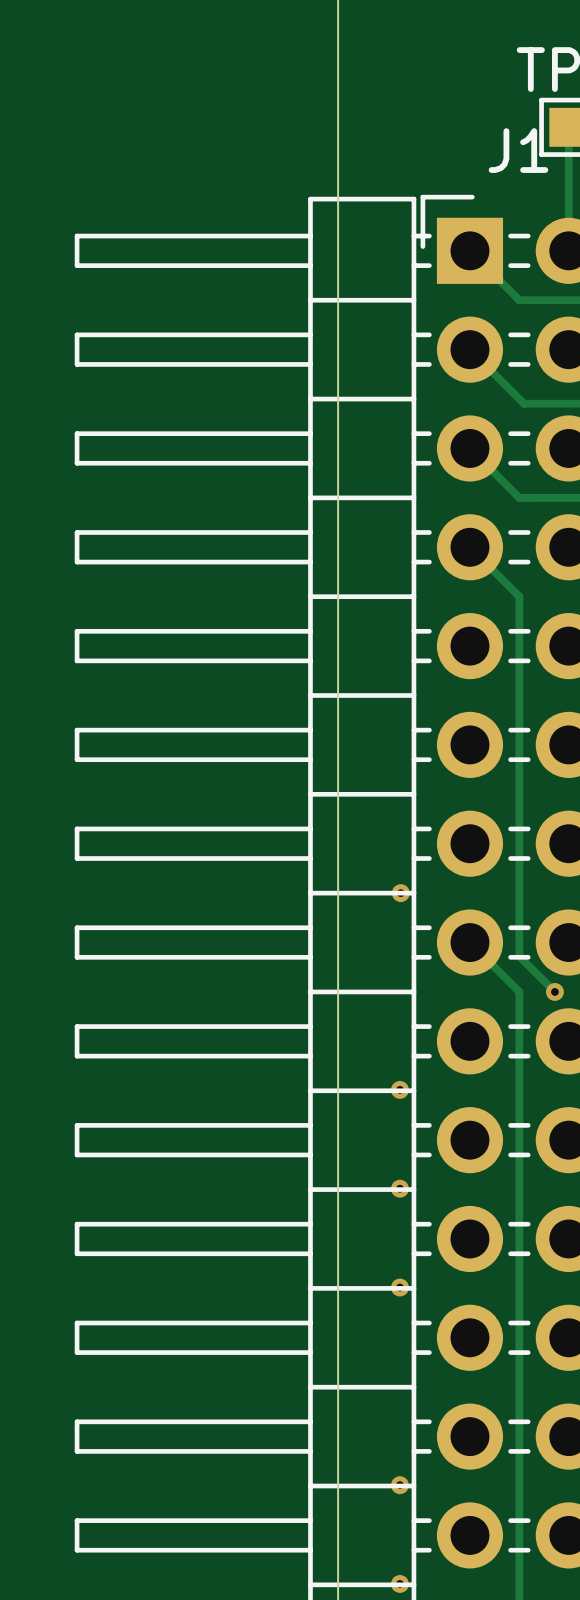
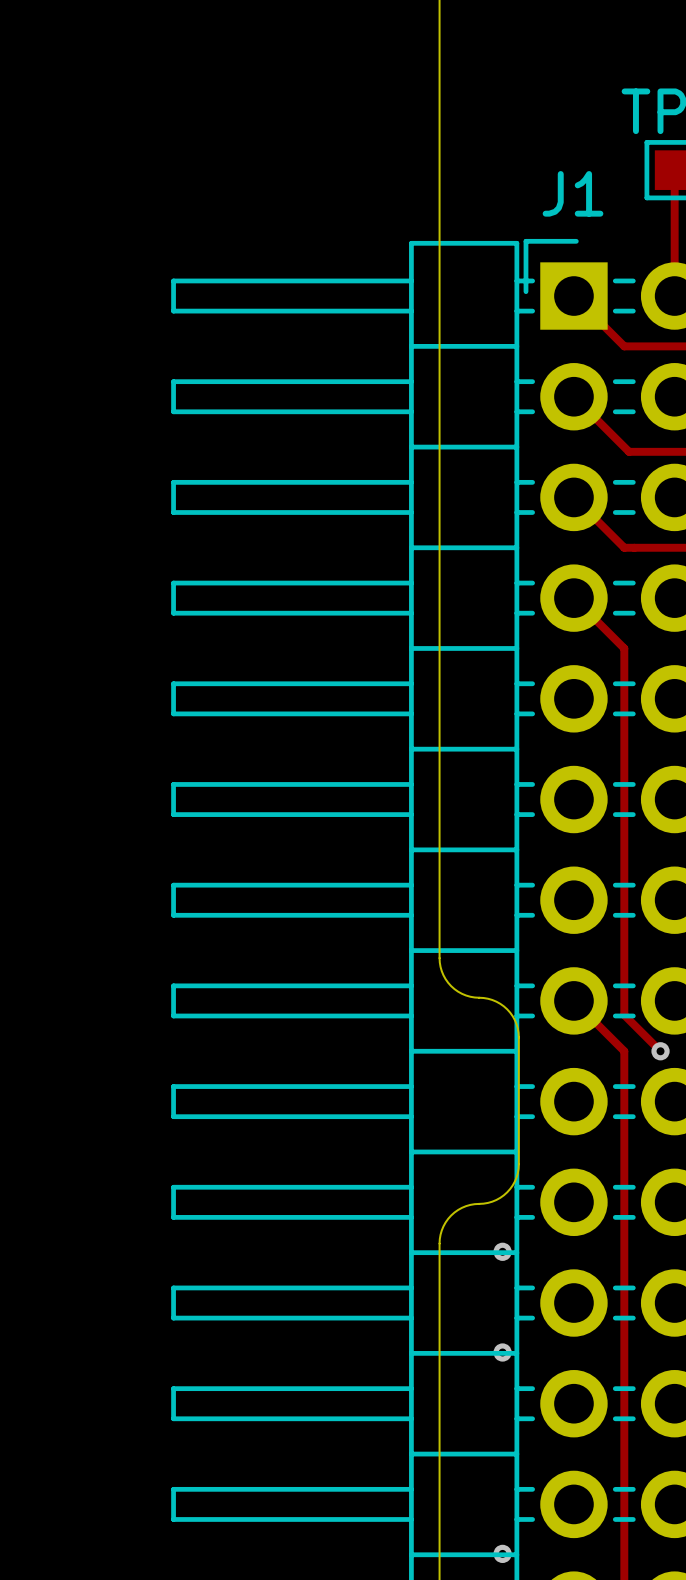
J1 name position: J1 (518, 150) -> J1 (573, 193)
via: (400, 893) -> none
board edge: (338, 900) (338, 1180) -> (439, 958) (443, 975) (454, 989) (470, 996) (492, 999) (507, 1009) (514, 1020) (518, 1037) (518, 1164) (516, 1177) (510, 1188) (500, 1197) (488, 1202) (466, 1206) (454, 1212) (443, 1226) (439, 1243)
via: (399, 1089) -> none

